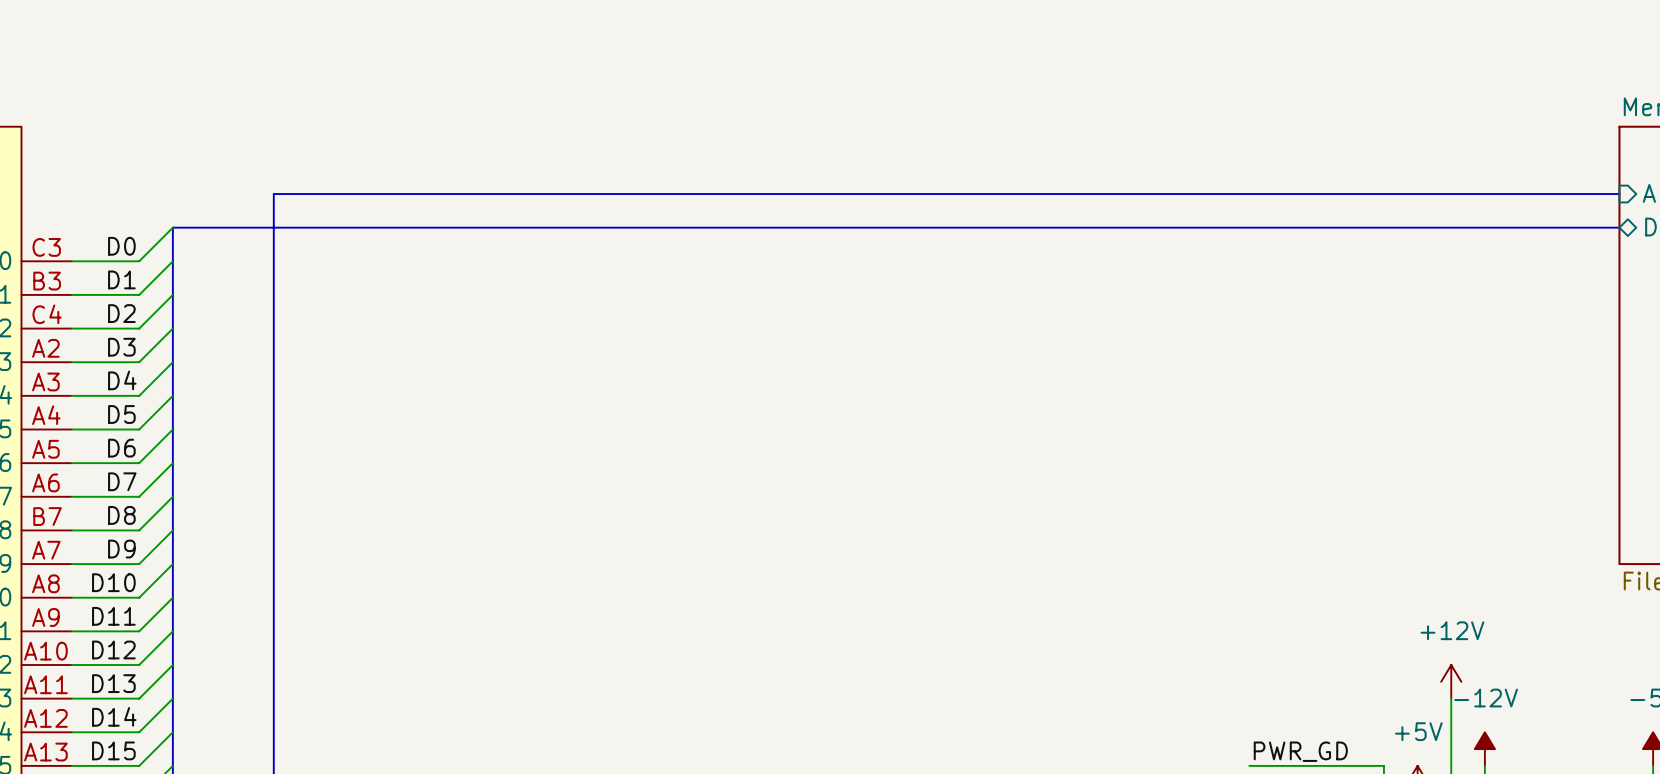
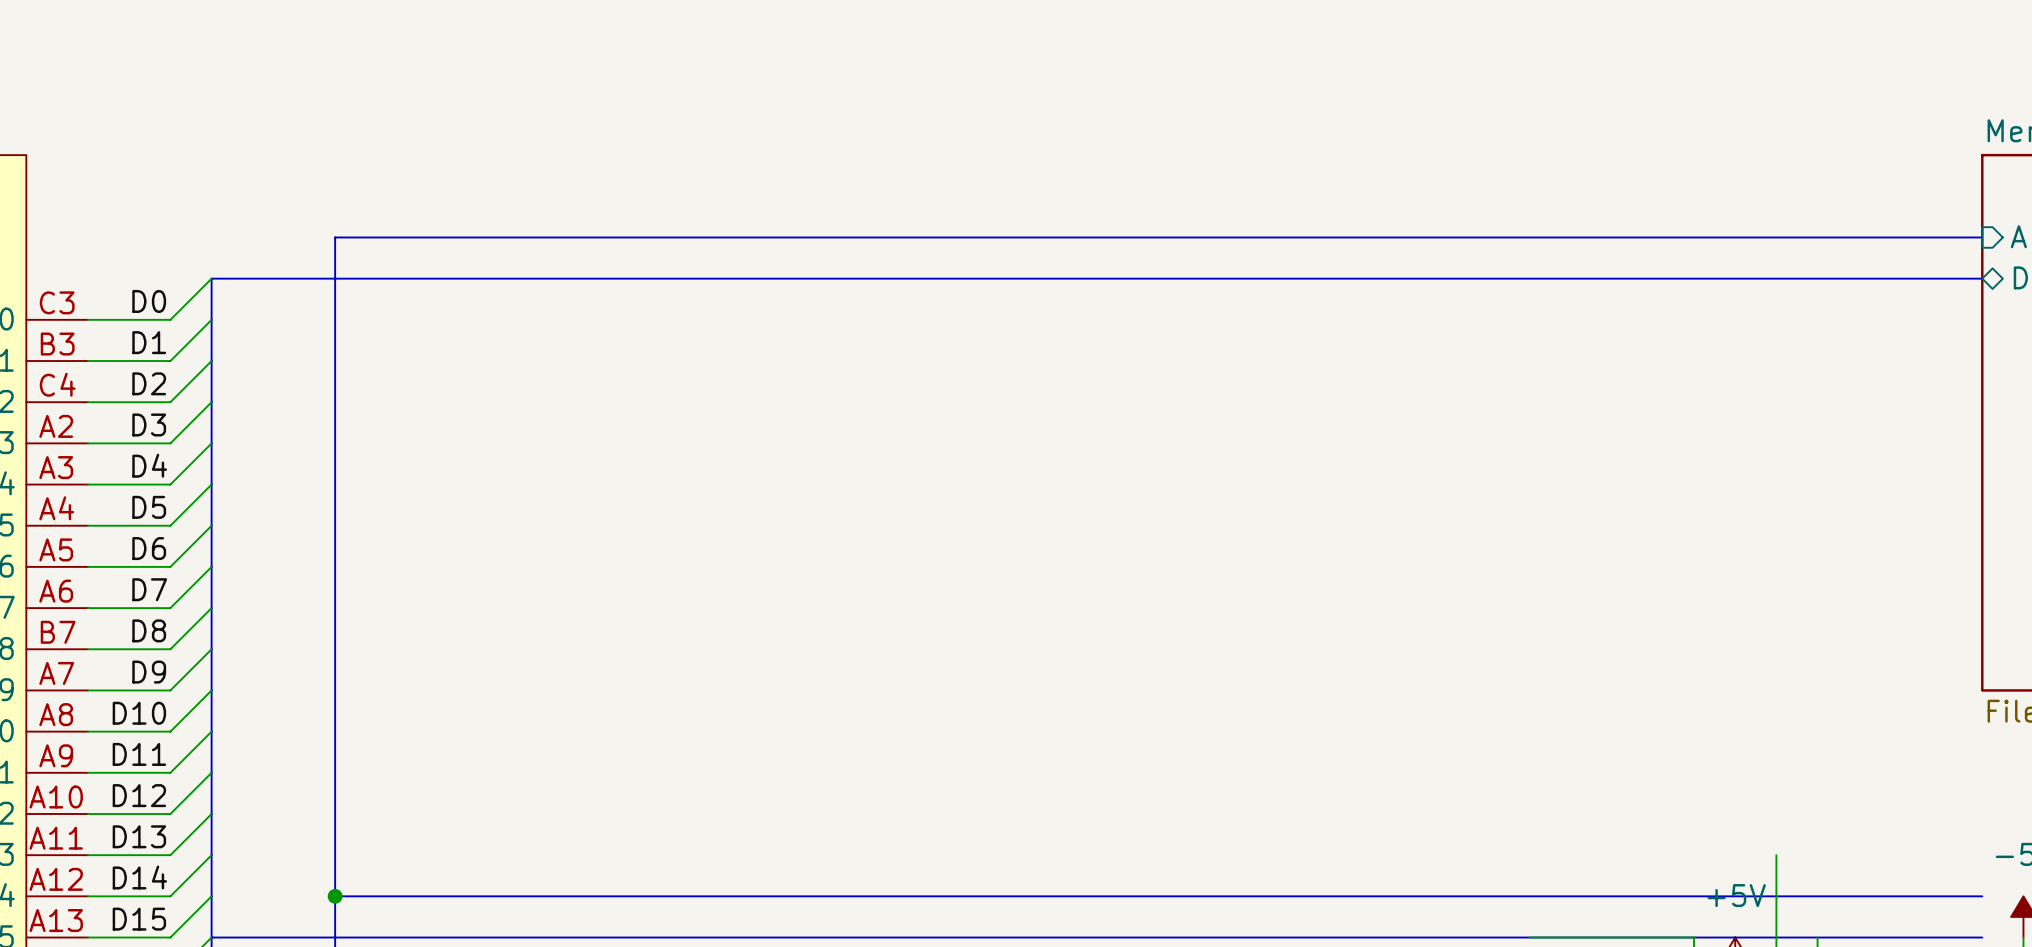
power symbol: +12V (1451, 681) -> none
bus: none -> (335, 896) (1982, 896)
junction: none -> (335, 896)
power symbol: -12V (1484, 749) -> none
label: PWR_GD (1300, 751) -> none
bus: none -> (211, 937) (1982, 937)

